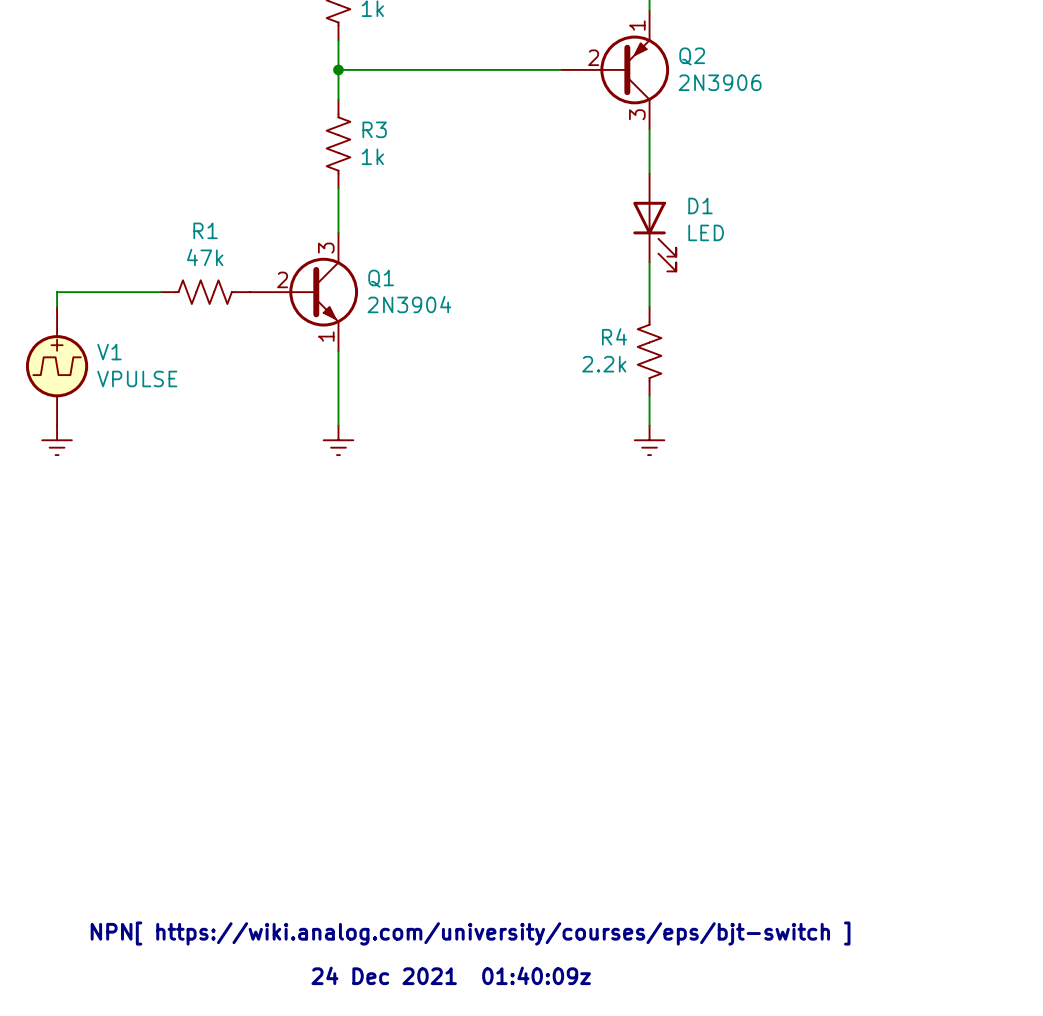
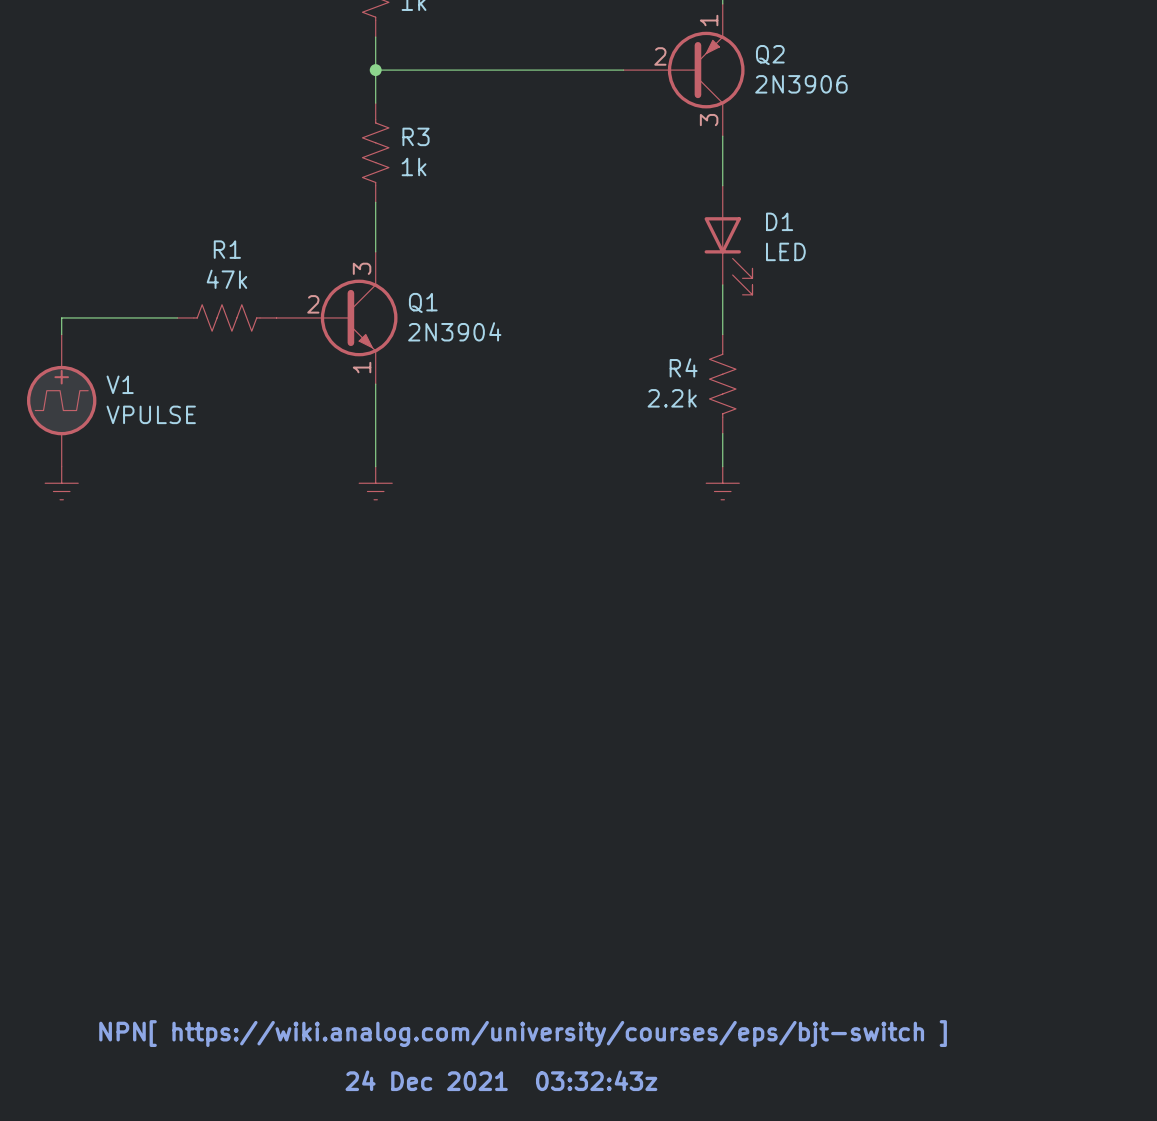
text: 24 Dec 2021 01:40:09z (451, 975) -> 24 Dec 2021 03:32:43z (501, 1080)

